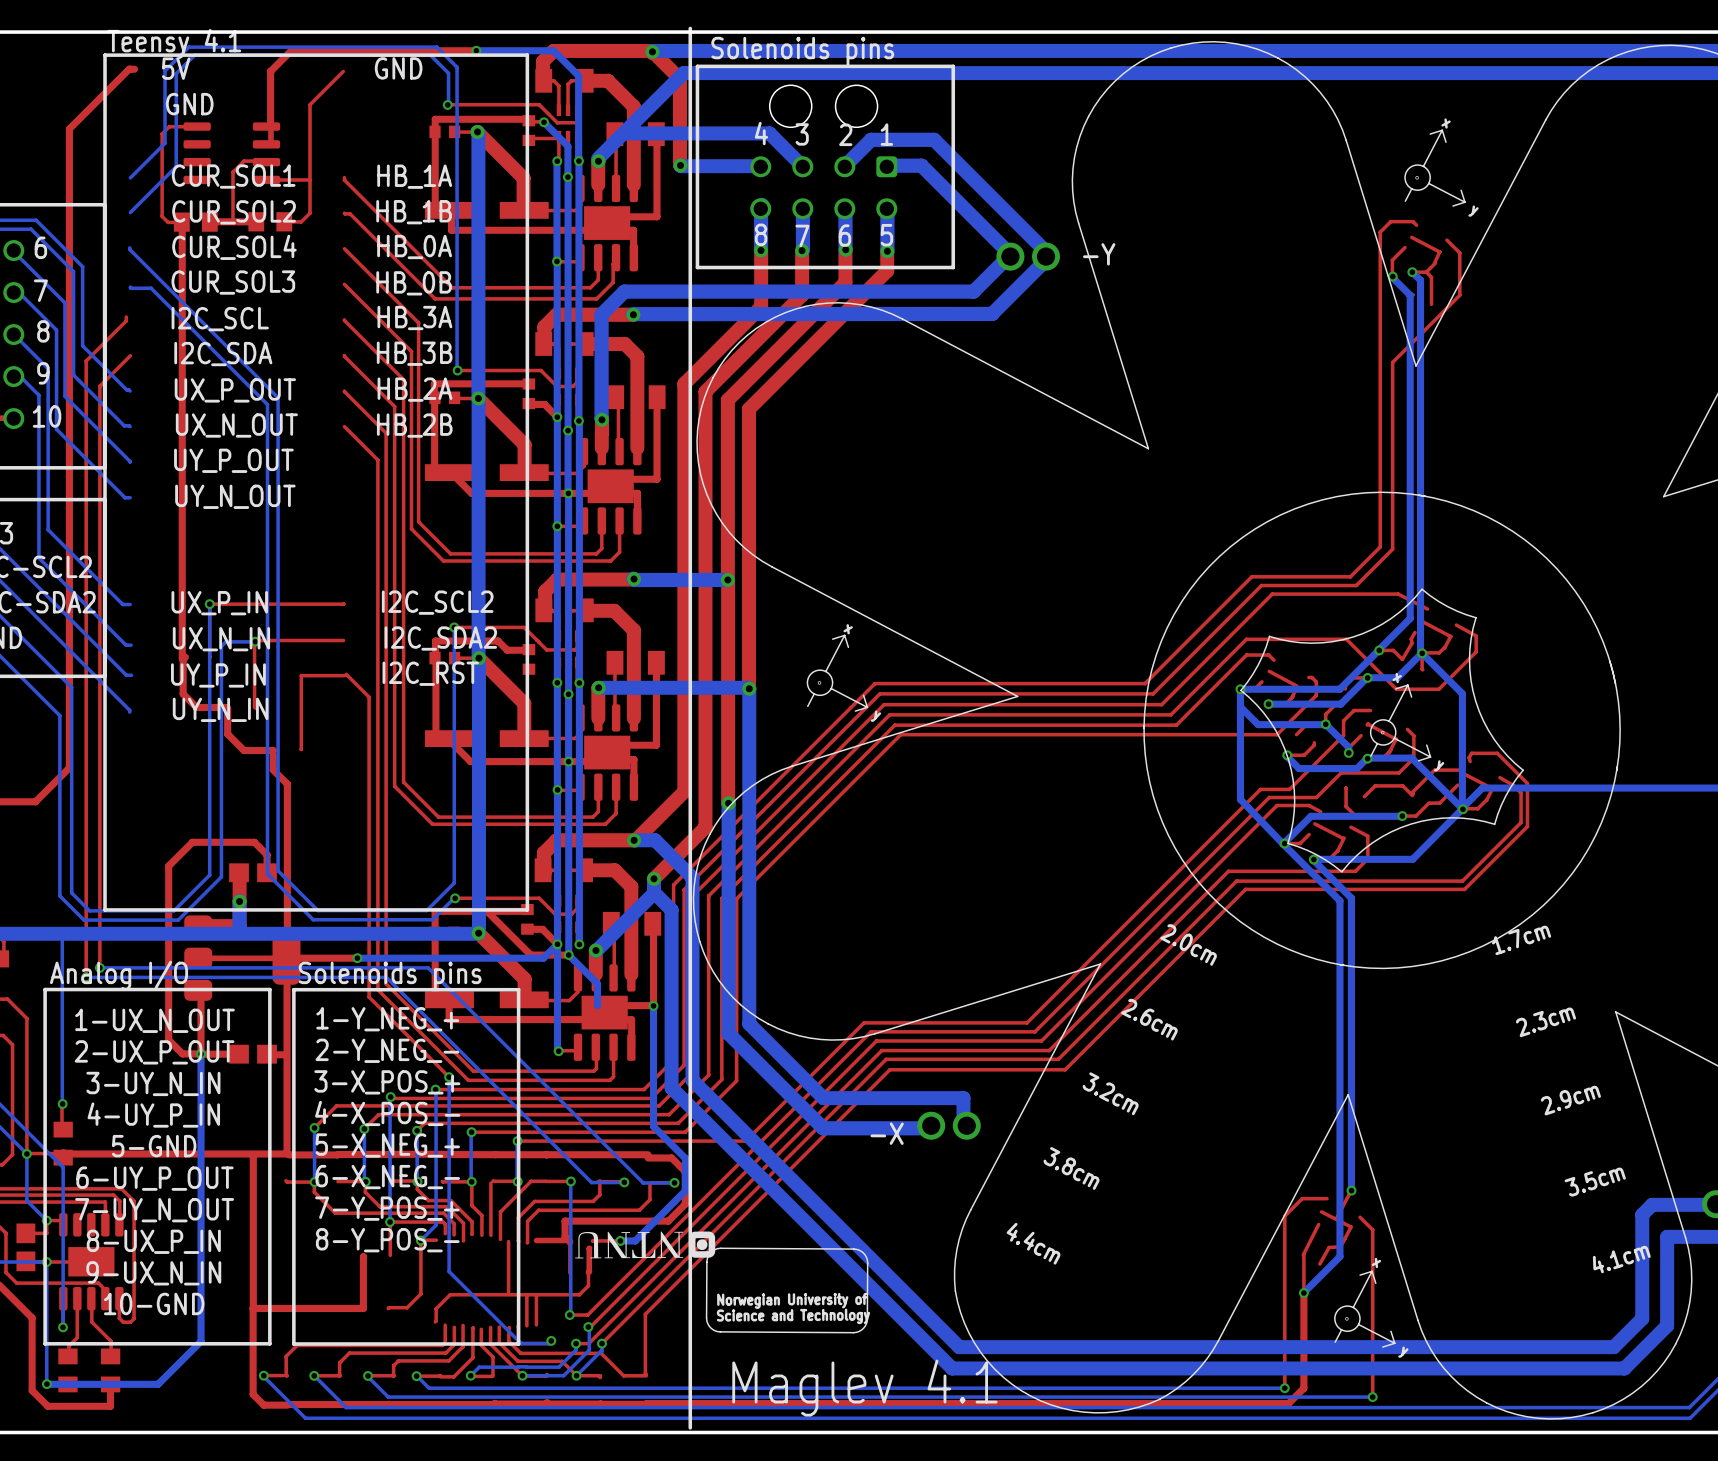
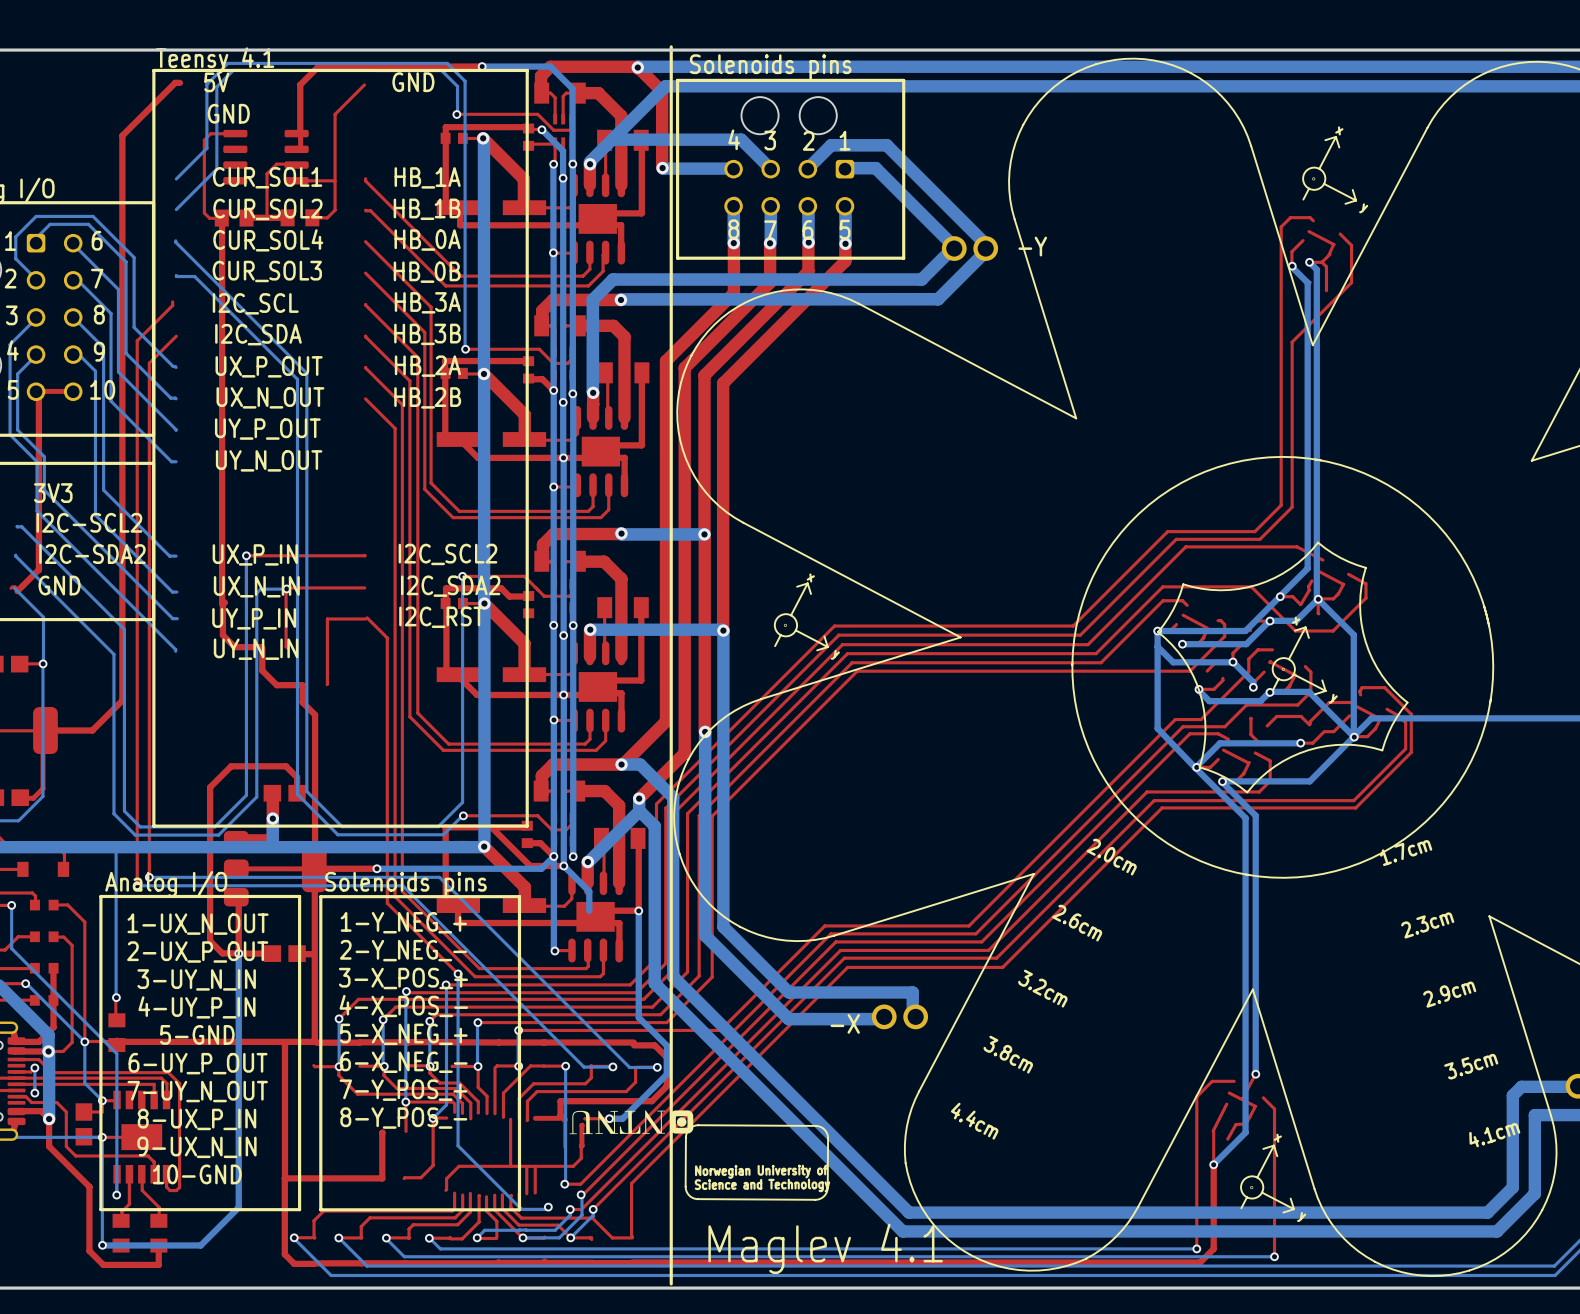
part footprint: [576, 174, 639, 272] -> [570, 173, 626, 265]
part footprint: [579, 437, 642, 535] -> [573, 405, 629, 498]
part footprint: [576, 704, 639, 801] -> [570, 641, 626, 733]
part footprint: [573, 964, 636, 1061] -> [568, 871, 623, 963]
part footprint: [59, 1213, 124, 1311] -> [113, 1090, 171, 1184]

